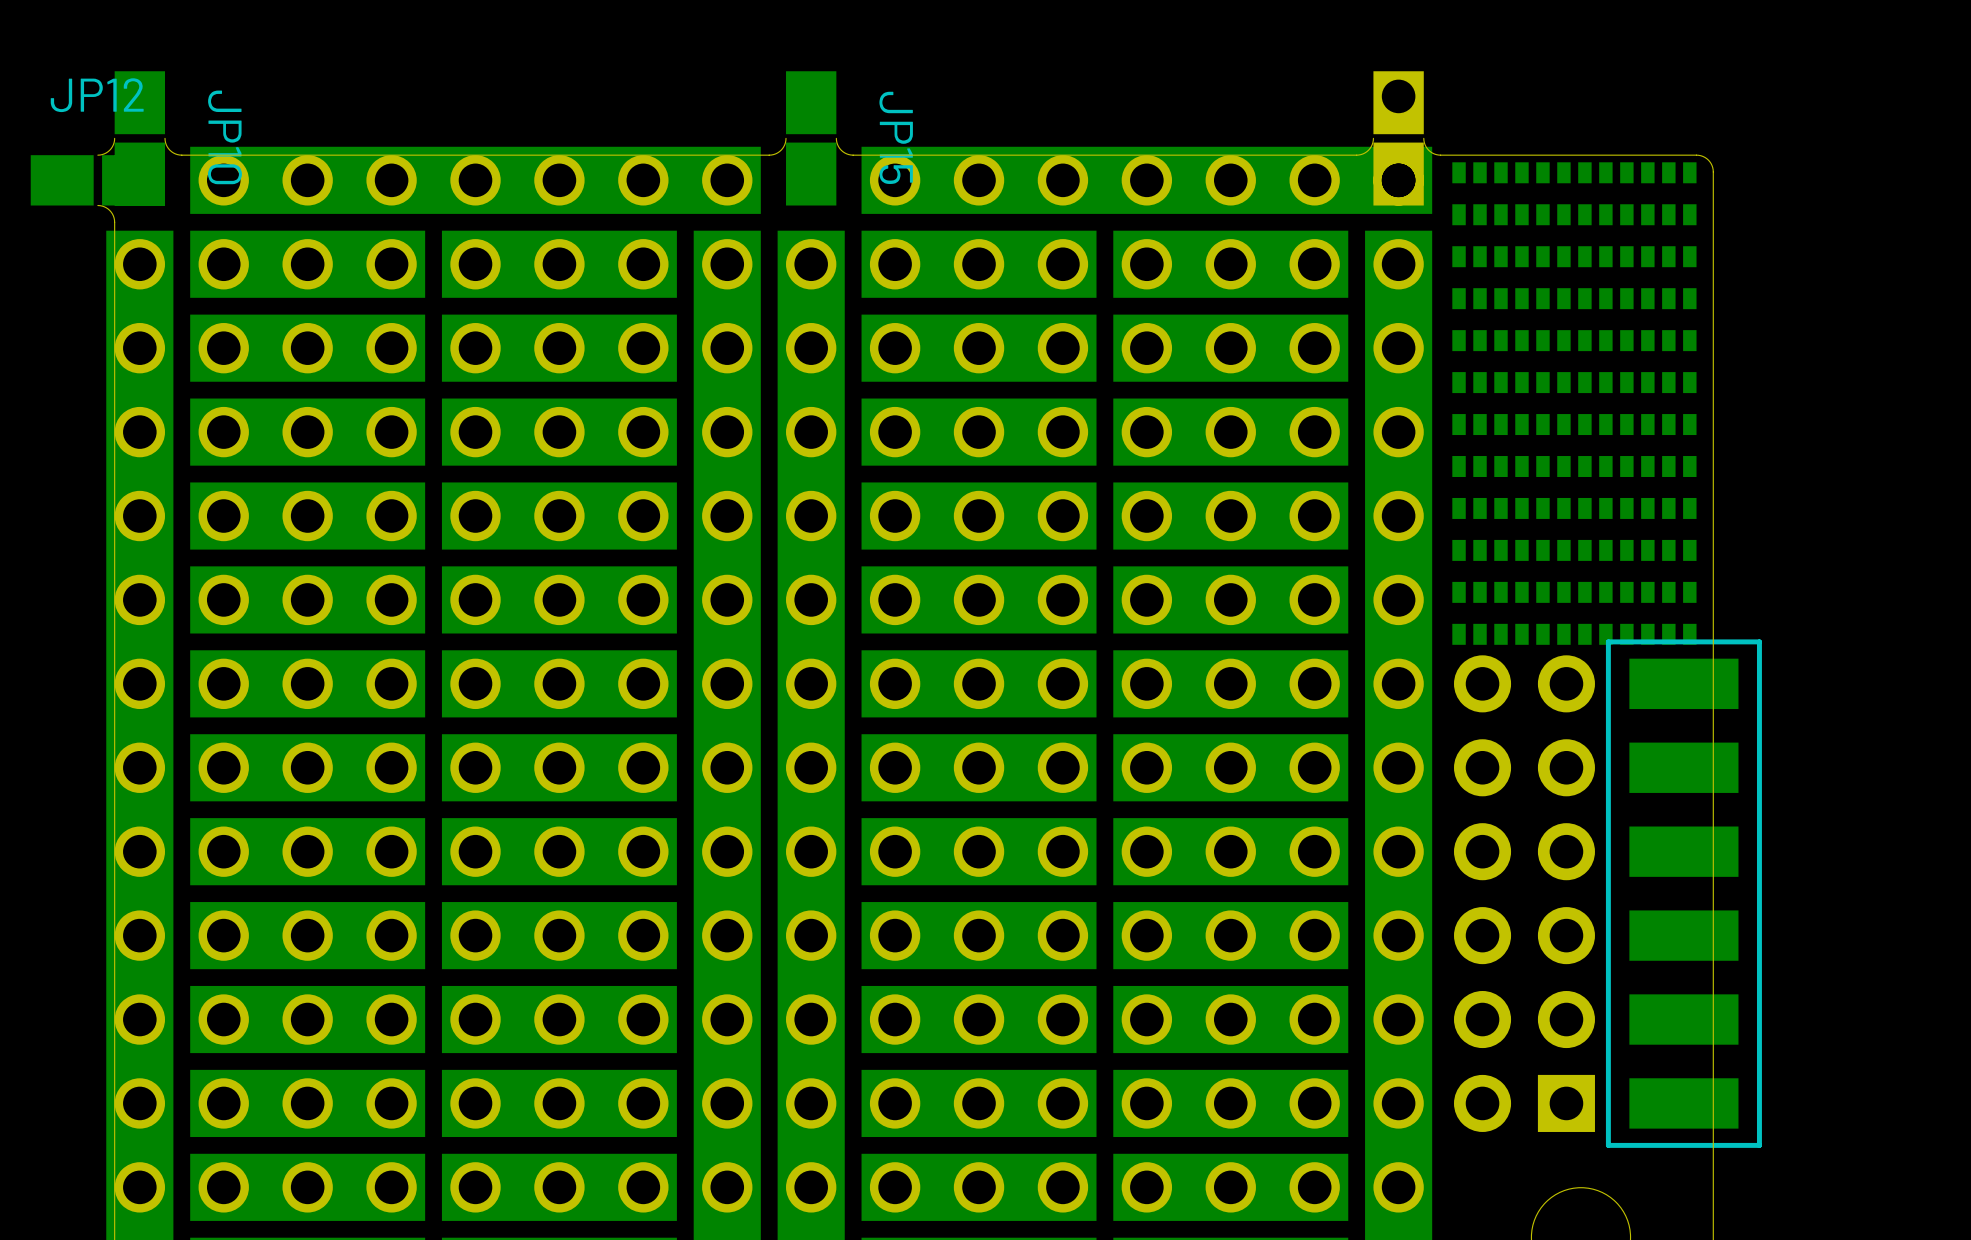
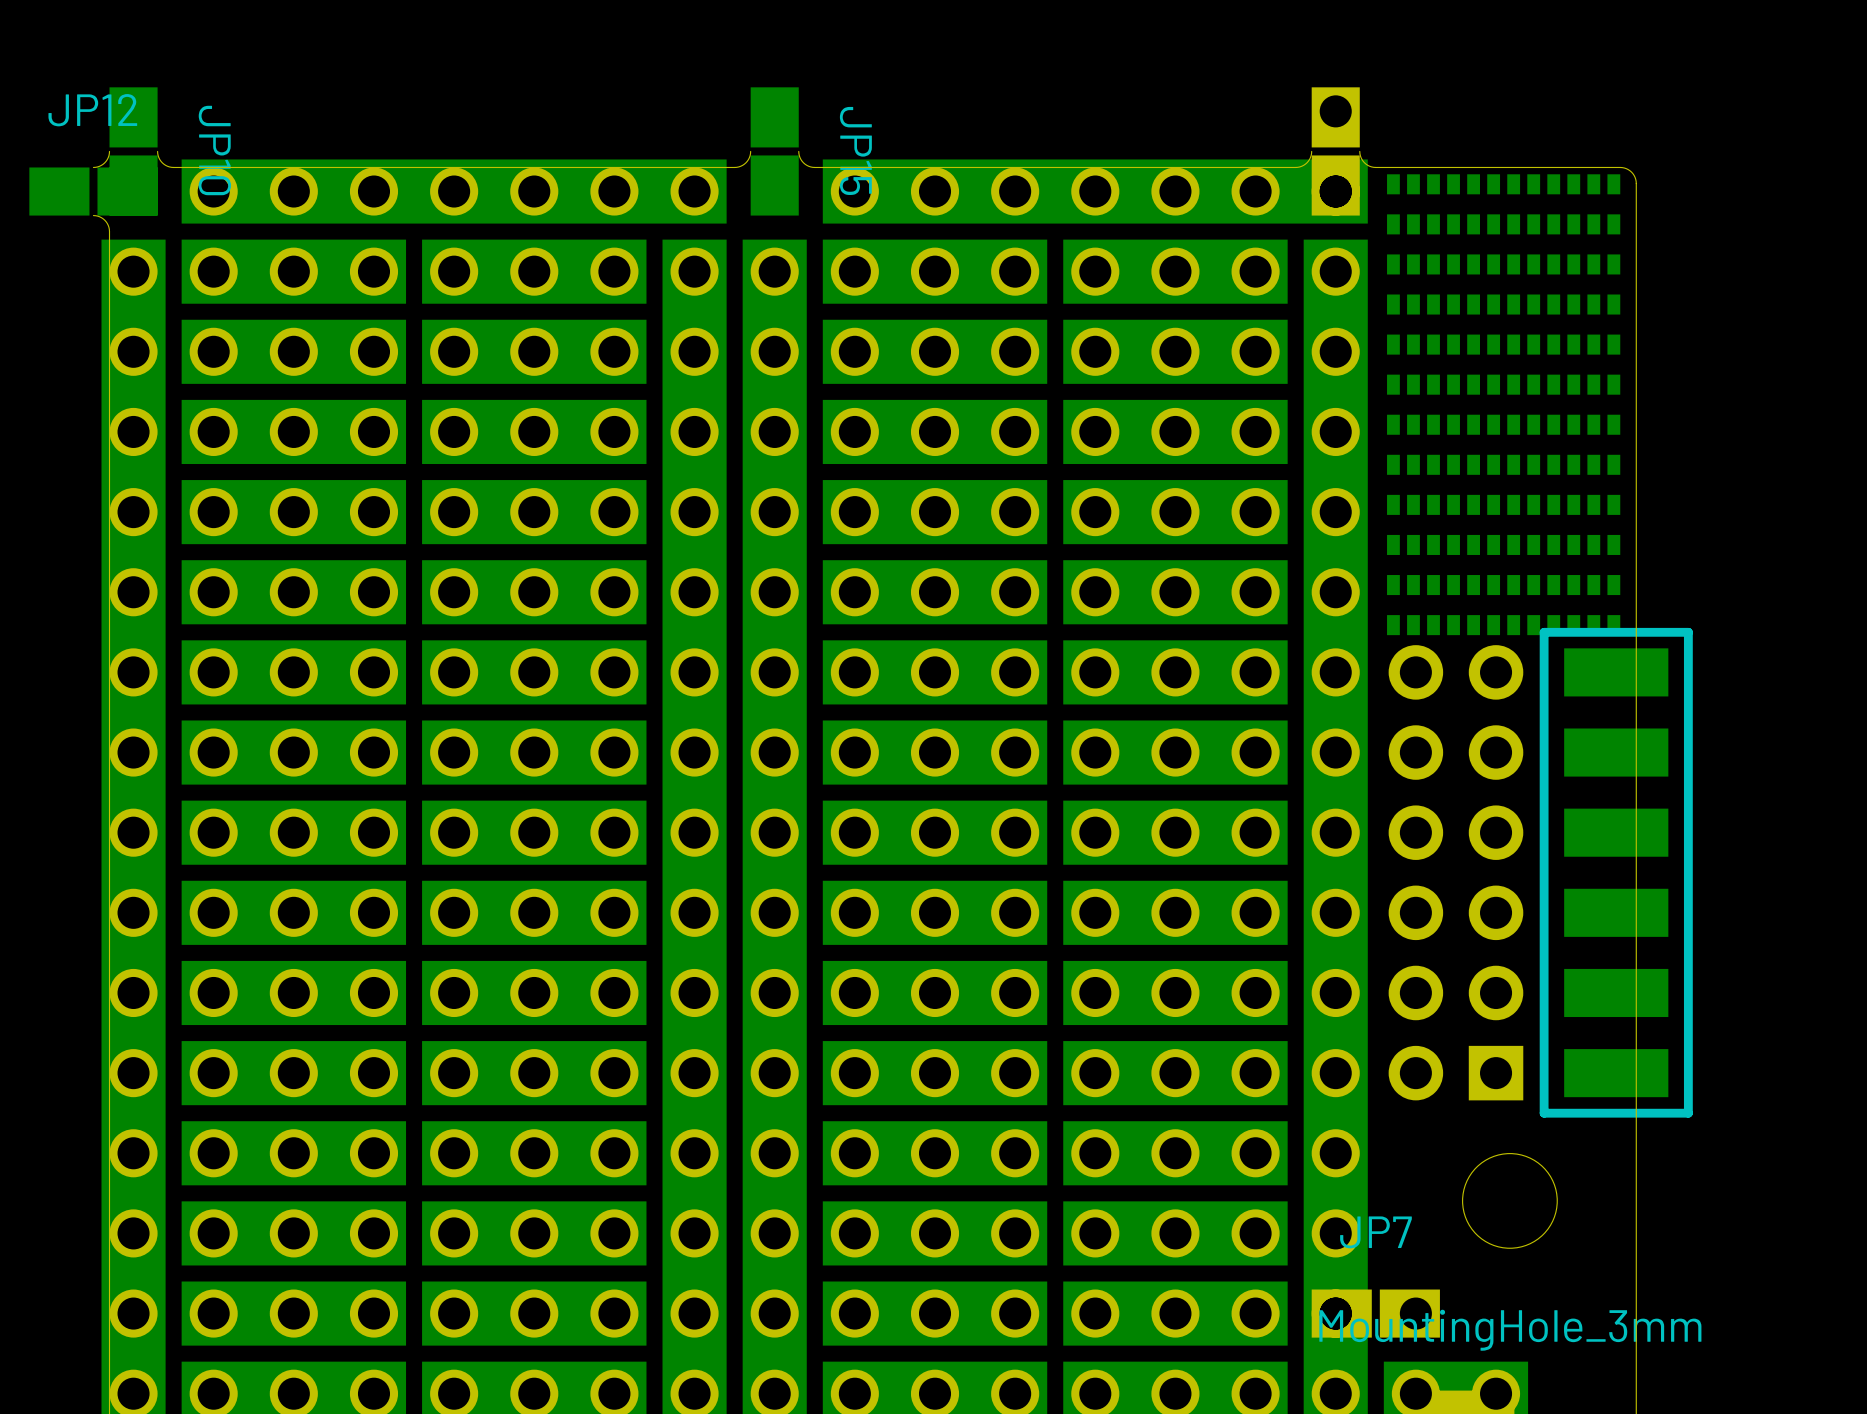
part footprint: [1605, 639, 1762, 1148] -> [1539, 627, 1693, 1118]

